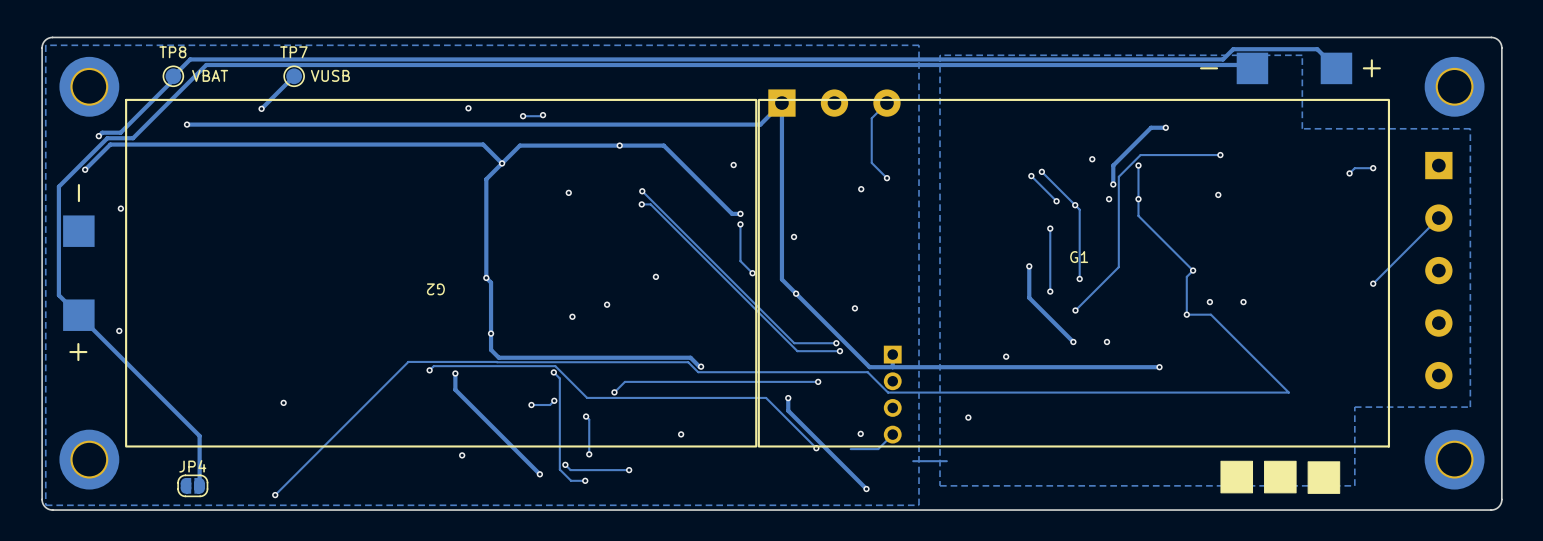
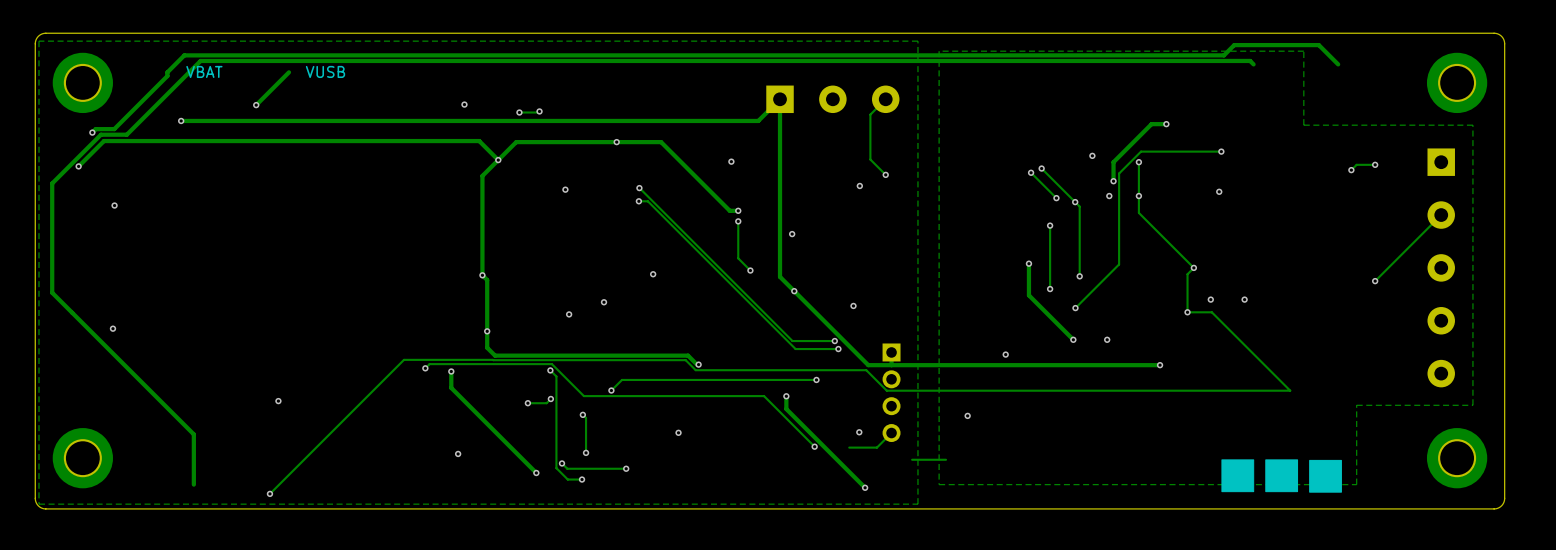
TP8: (173, 76) -> none
TP7: (294, 76) -> none
G1: (1073, 250) -> none
G2: (410, 273) -> none
JP4: (192, 485) -> none

